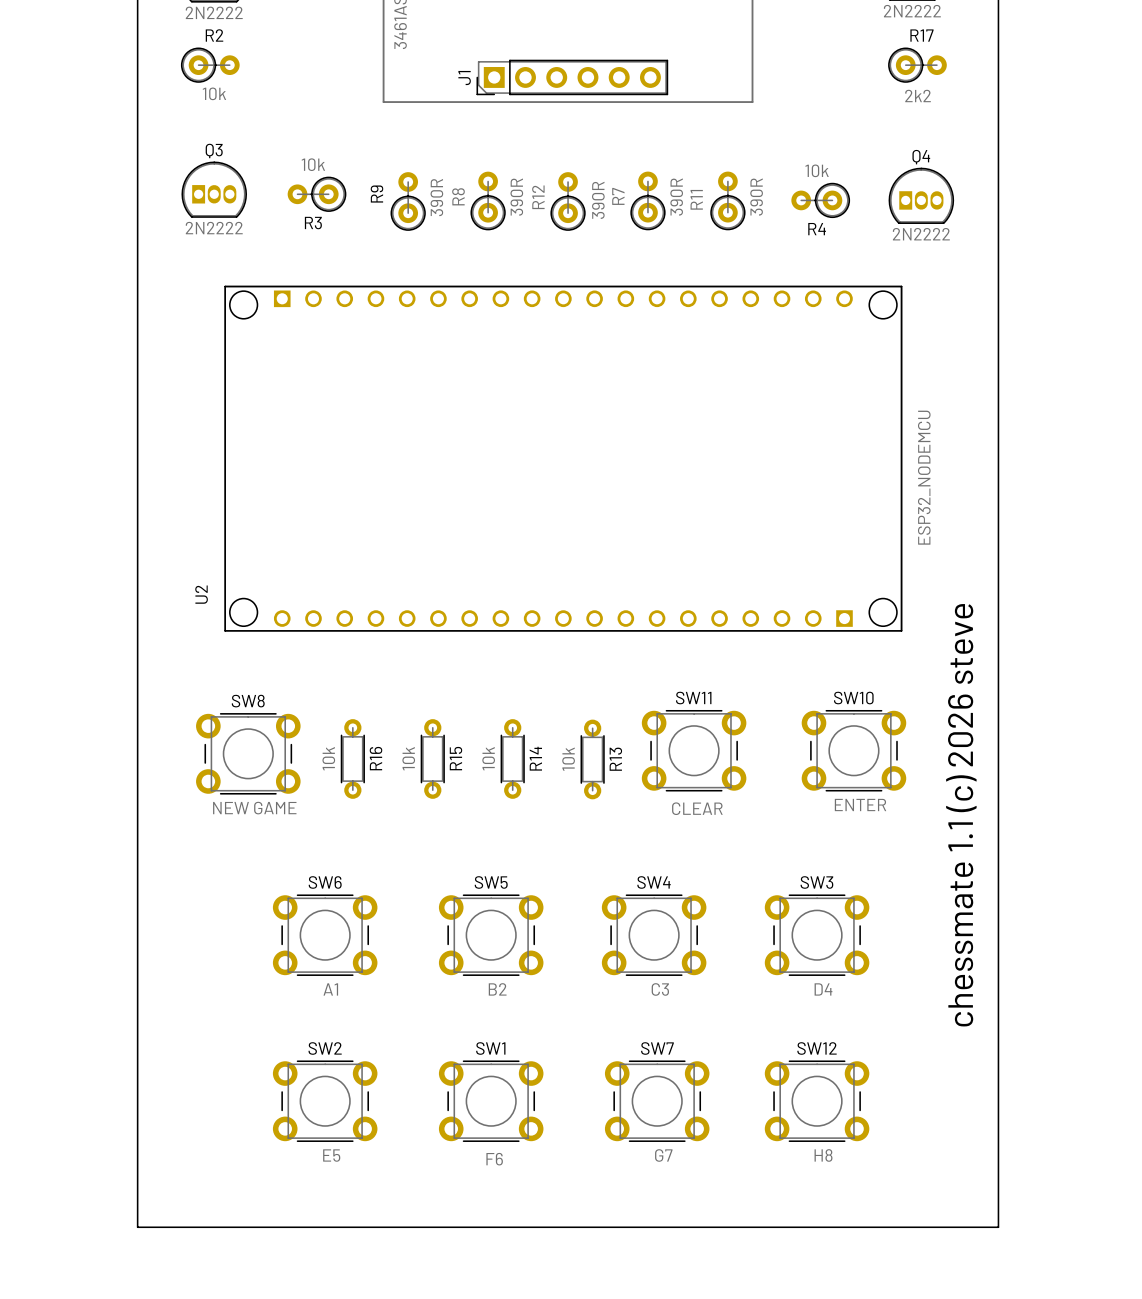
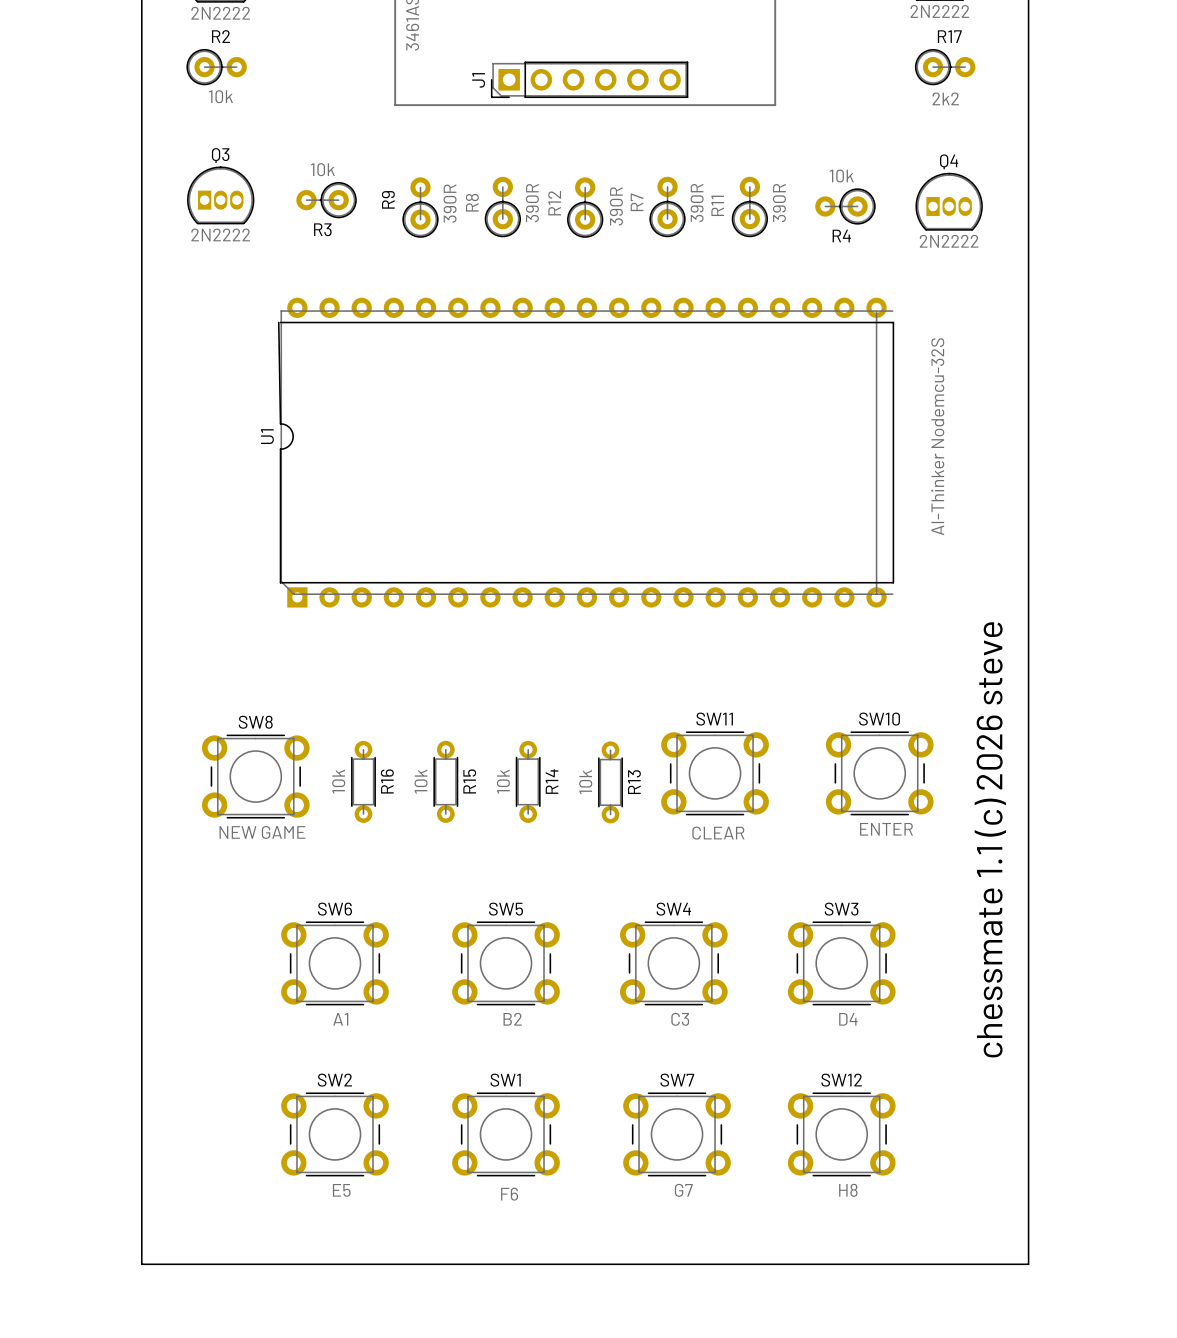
U1: none -> AI-Thinker Nodemcu-32S (586, 452)
U2: ESP32_NODEMCU (563, 458) -> none

